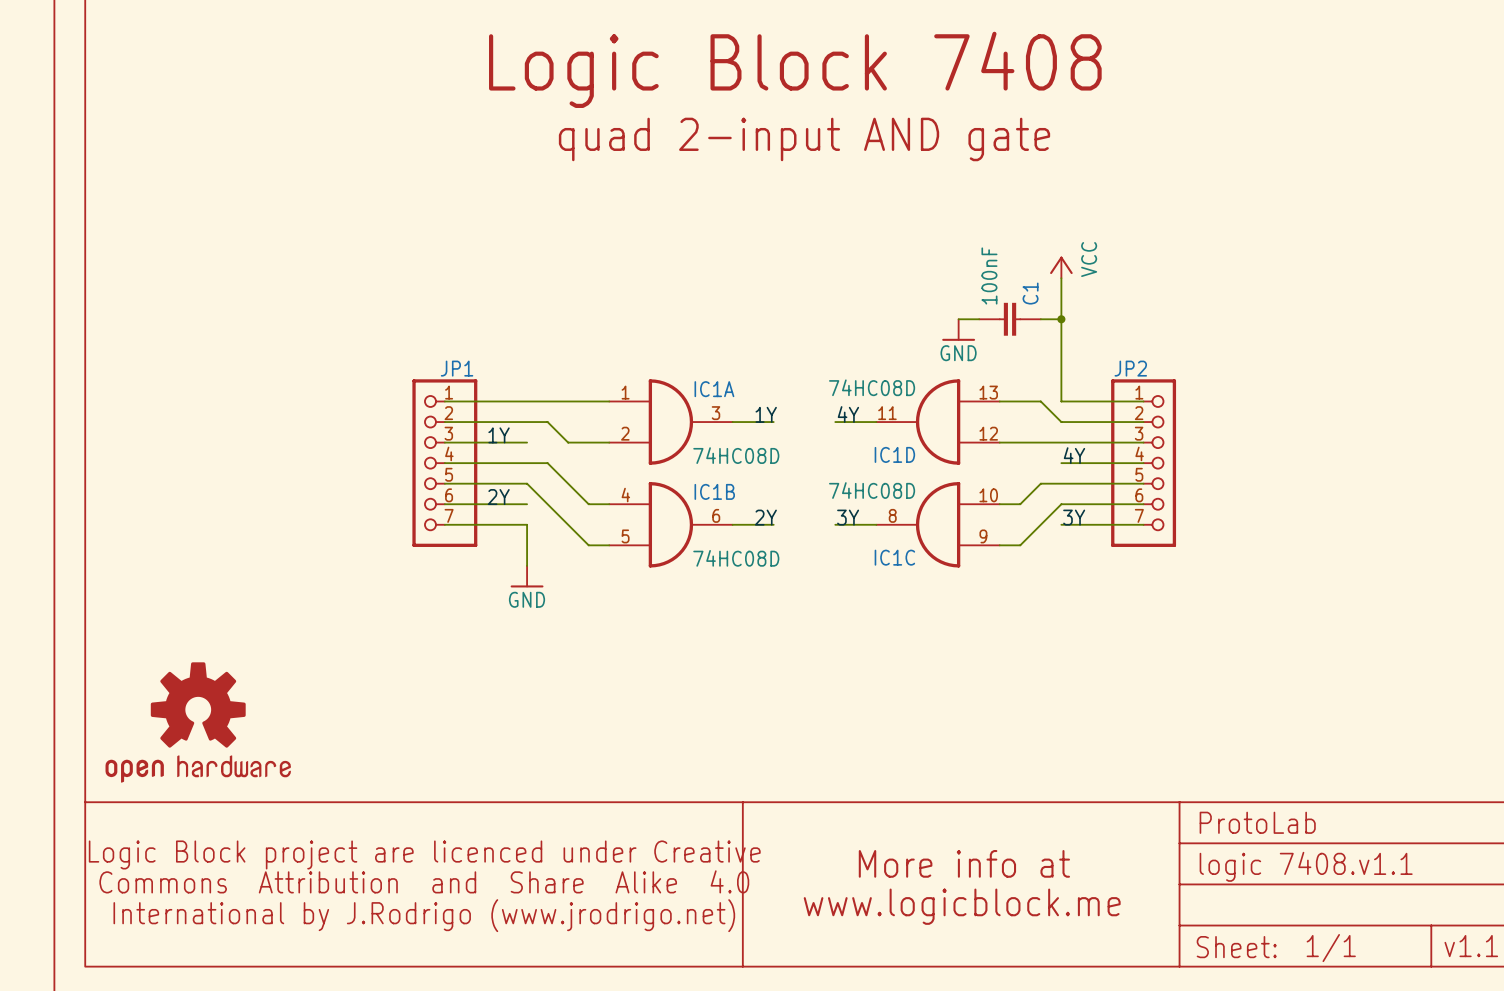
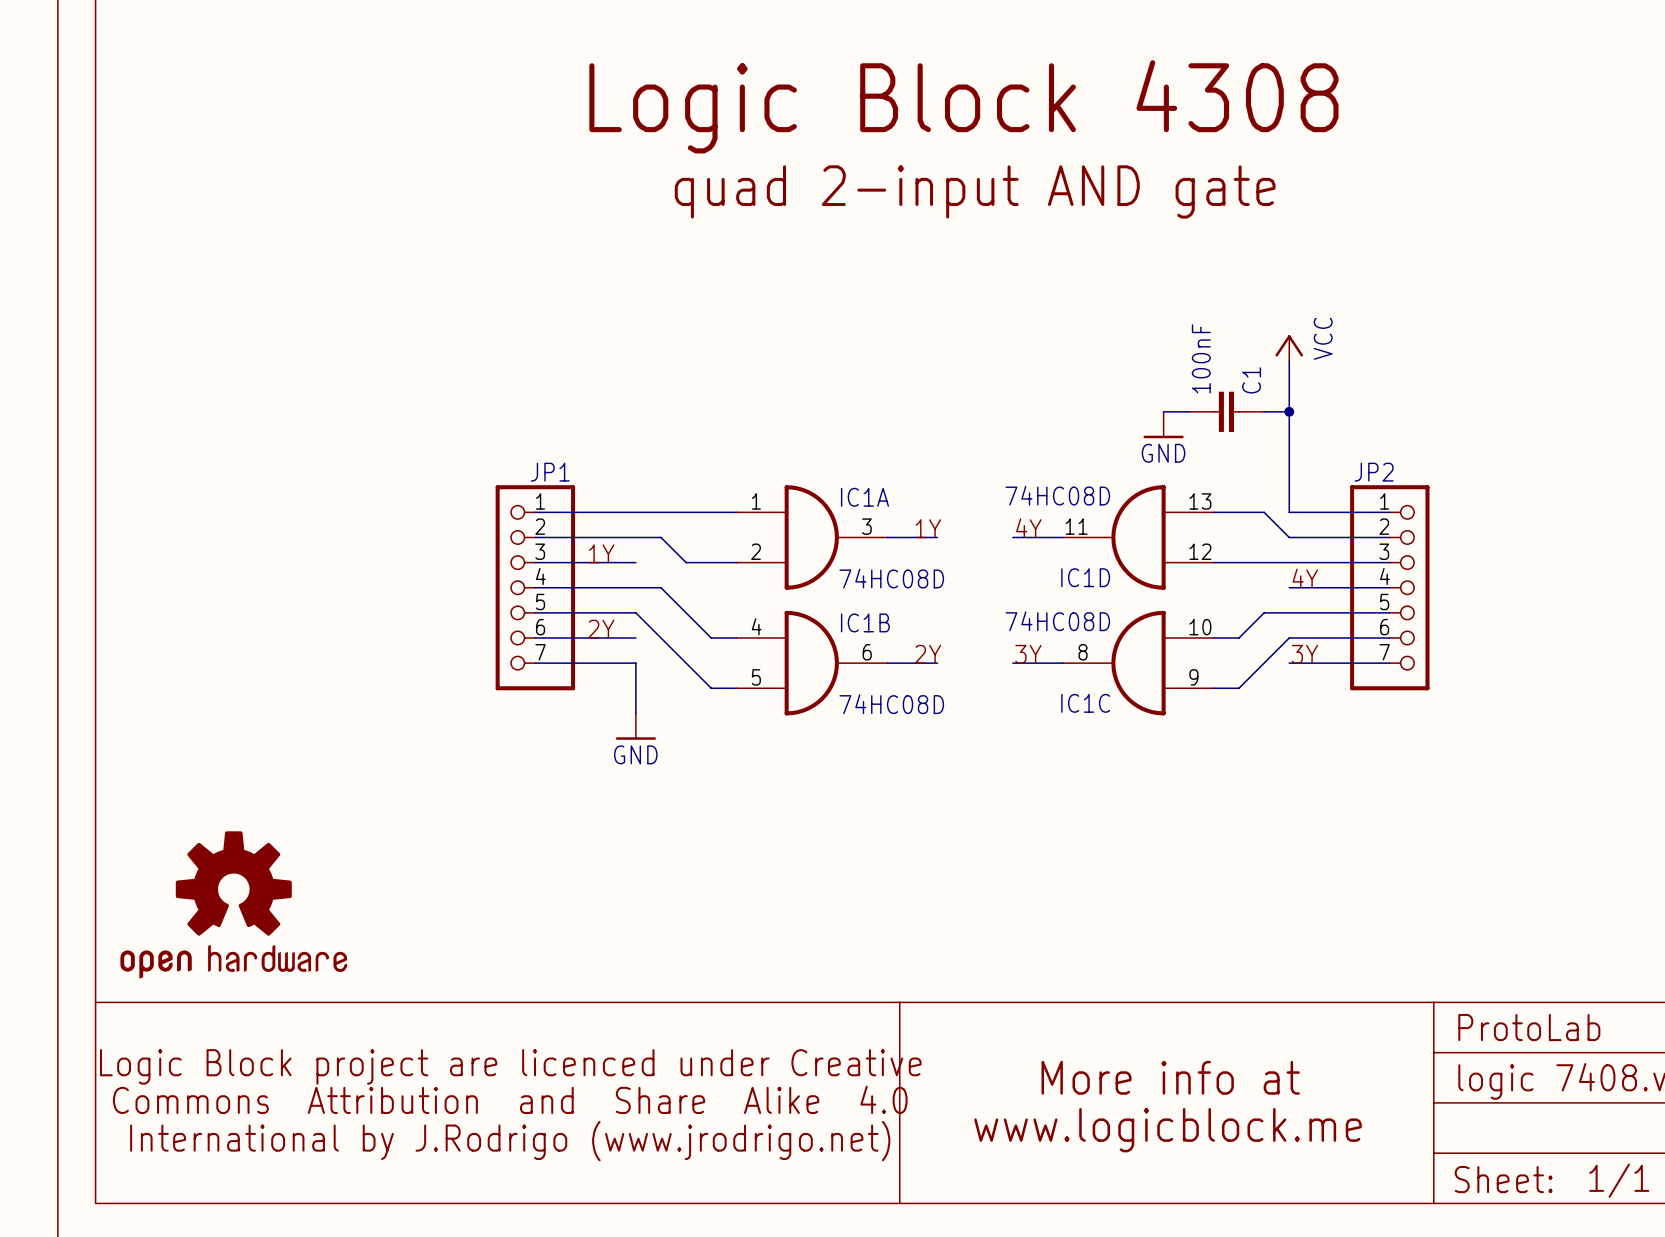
text: Logic Block 7408 (795, 69) -> Logic Block 4308 (963, 106)

